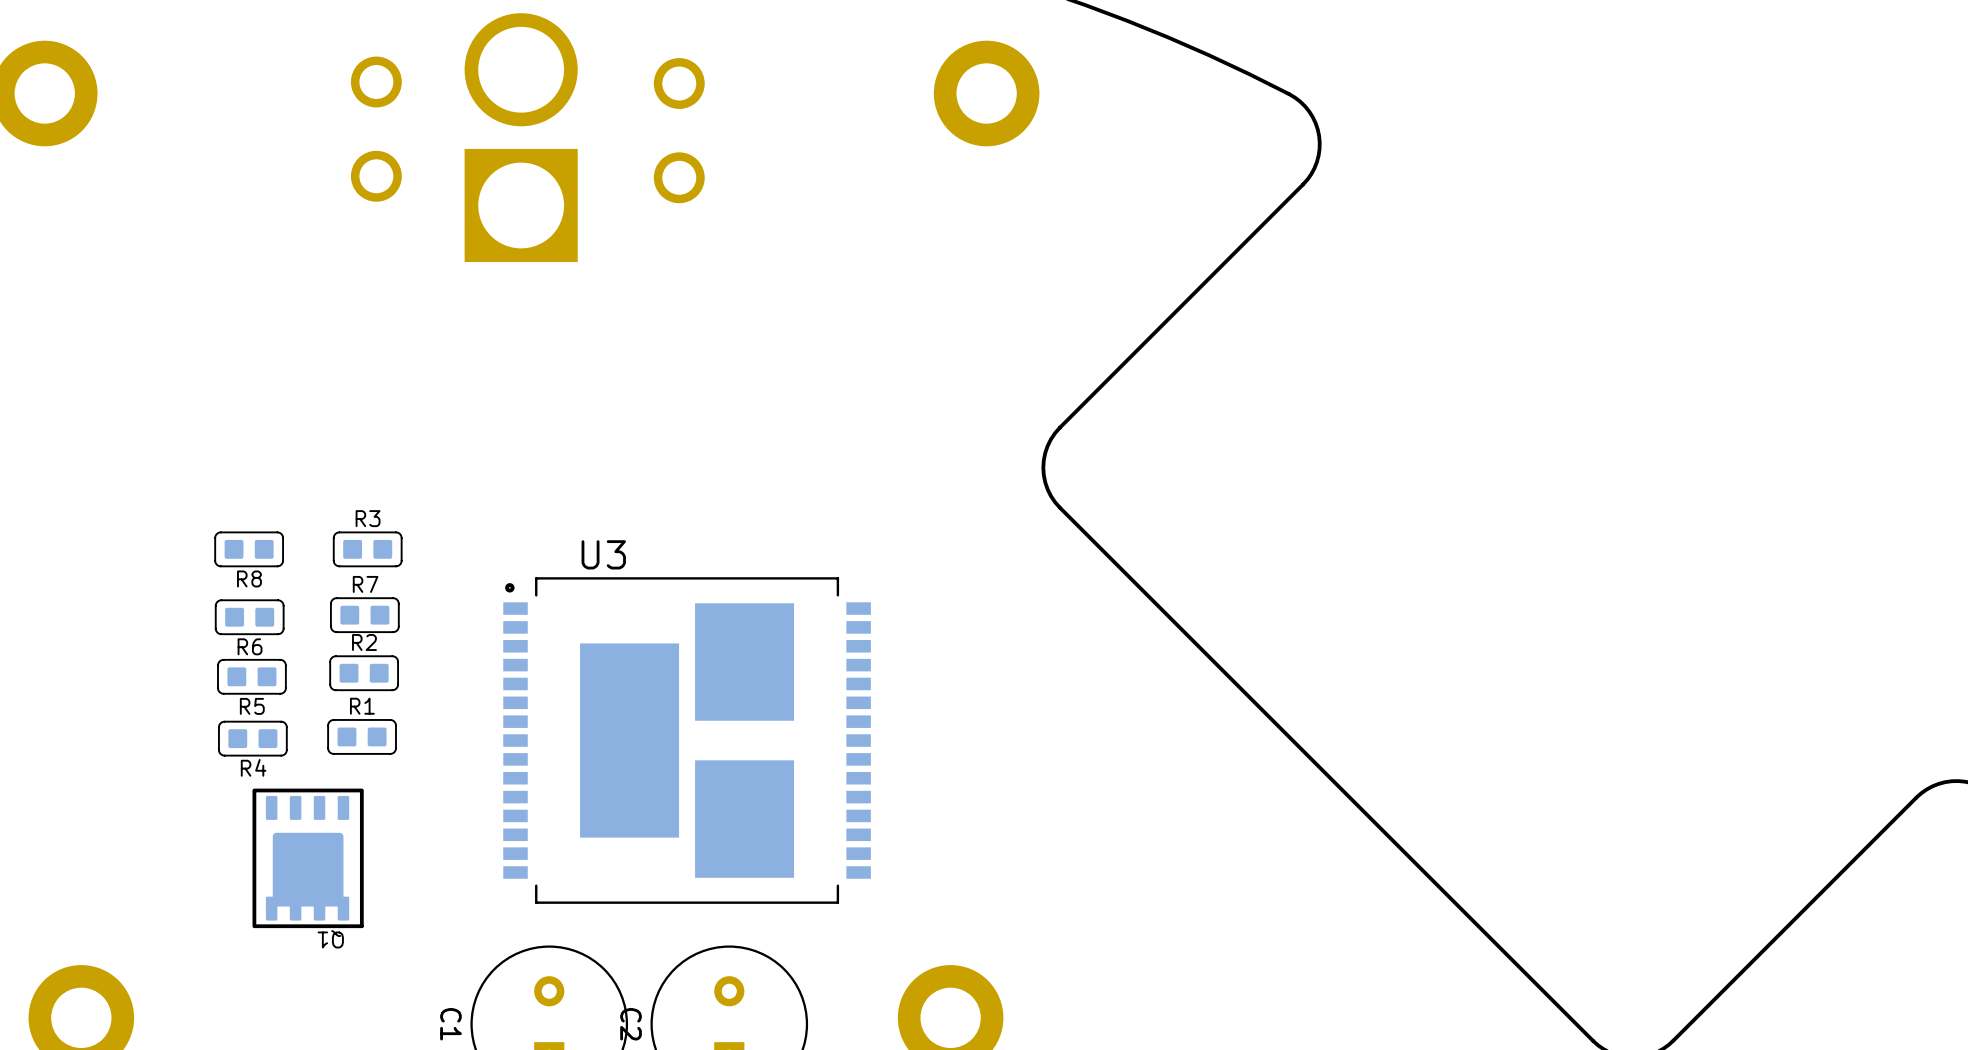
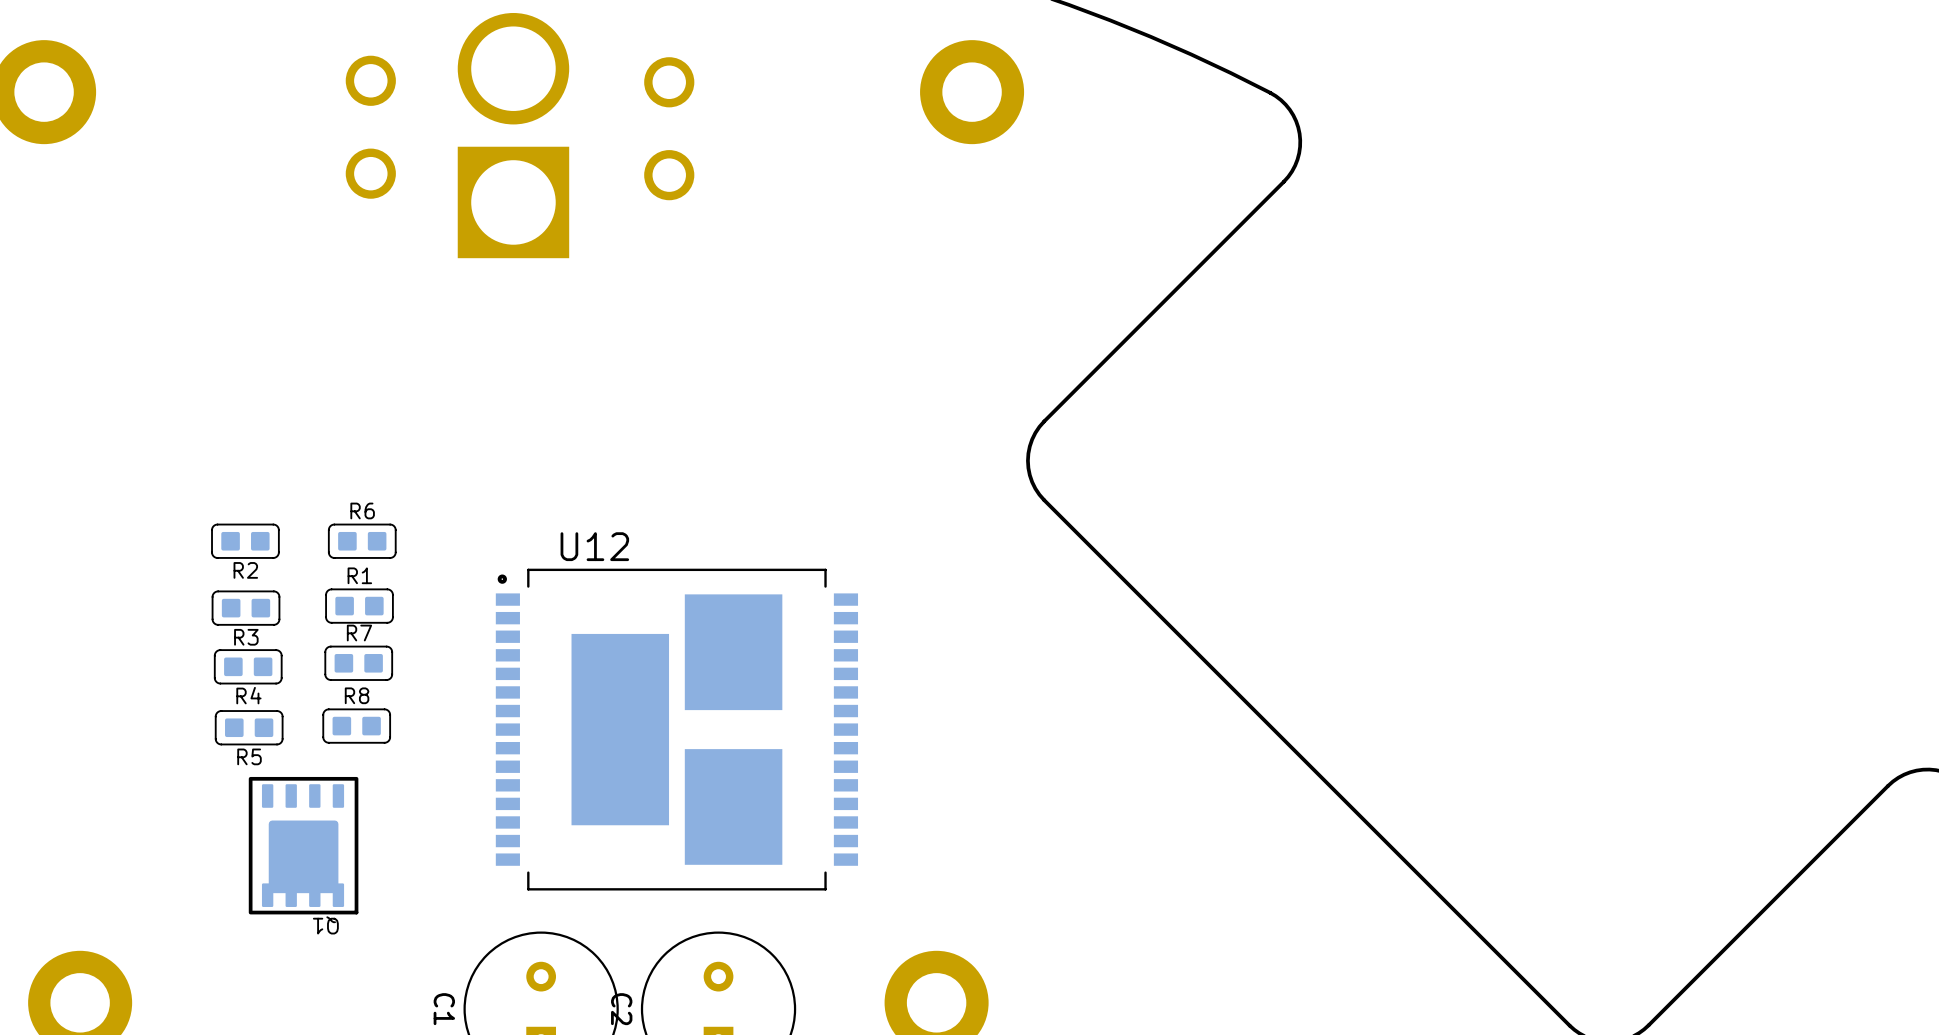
R3 name: R3 (368, 518) -> R6 (362, 510)
U3 name: U3 (603, 554) -> U12 (594, 546)
R8 name: R8 (249, 578) -> R2 (245, 570)
R7 name: R7 (365, 584) -> R1 (359, 575)
R2 name: R2 (364, 642) -> R7 (359, 633)
R6 name: R6 (250, 646) -> R3 (246, 637)
R5 name: R5 (252, 706) -> R4 (248, 695)
R1 name: R1 (362, 706) -> R8 (357, 695)
R4 name: R4 (253, 767) -> R5 (249, 756)

